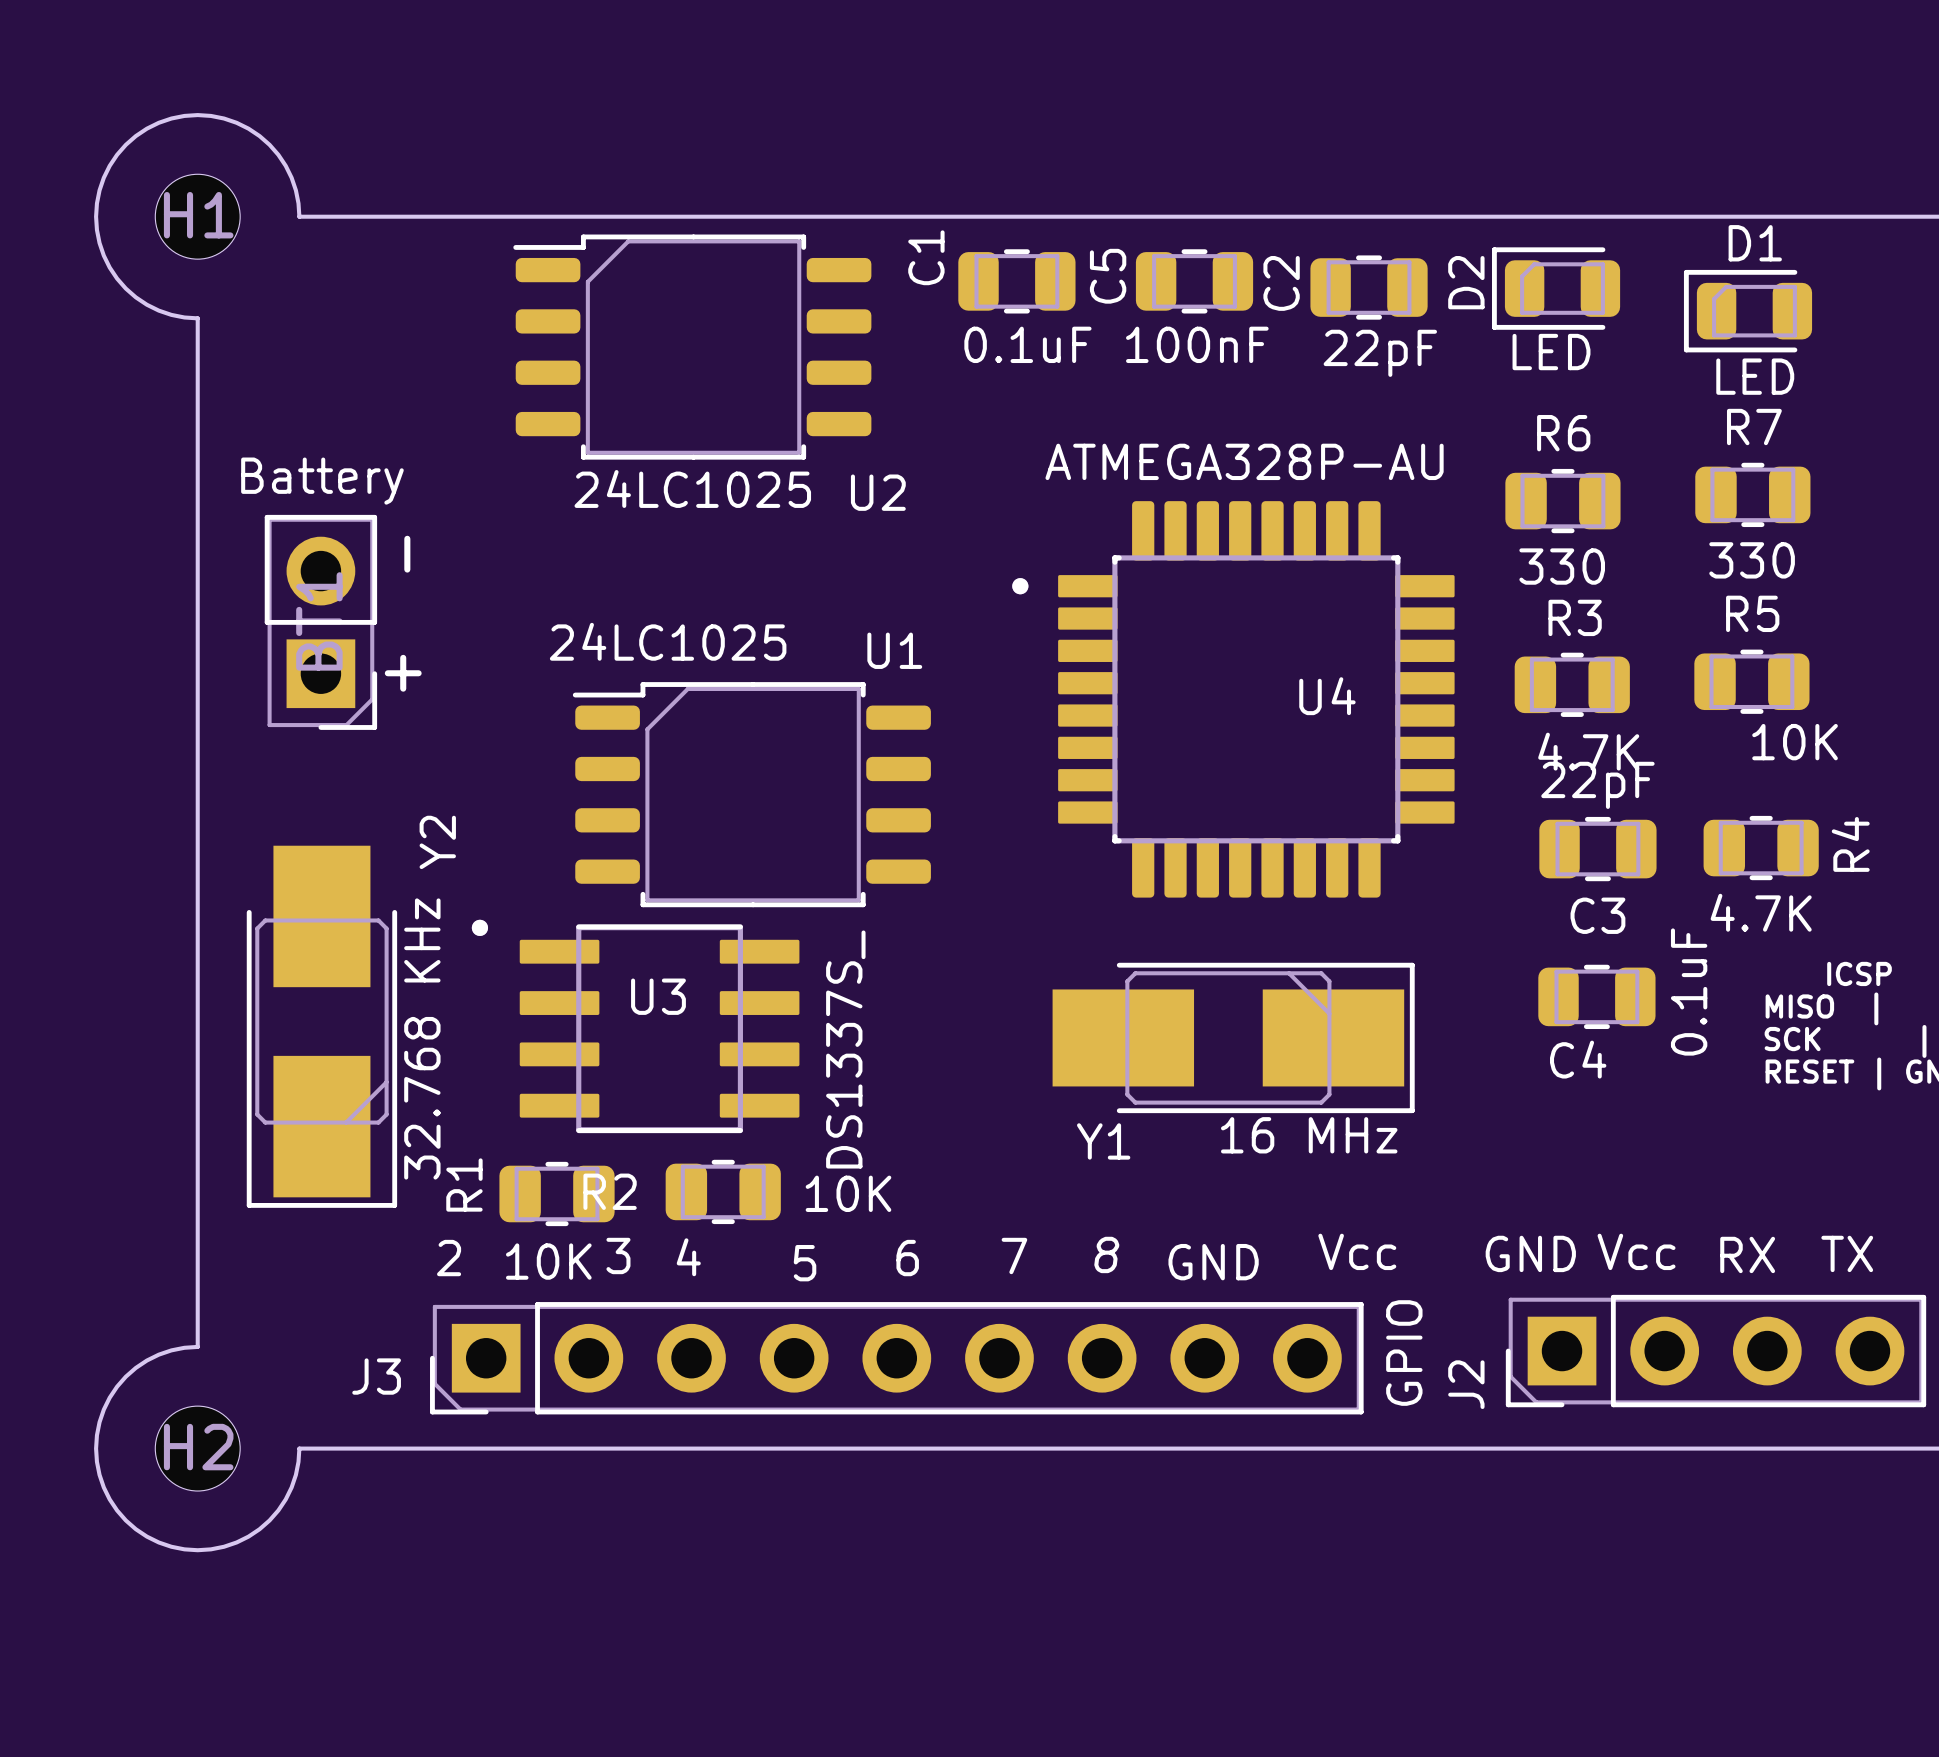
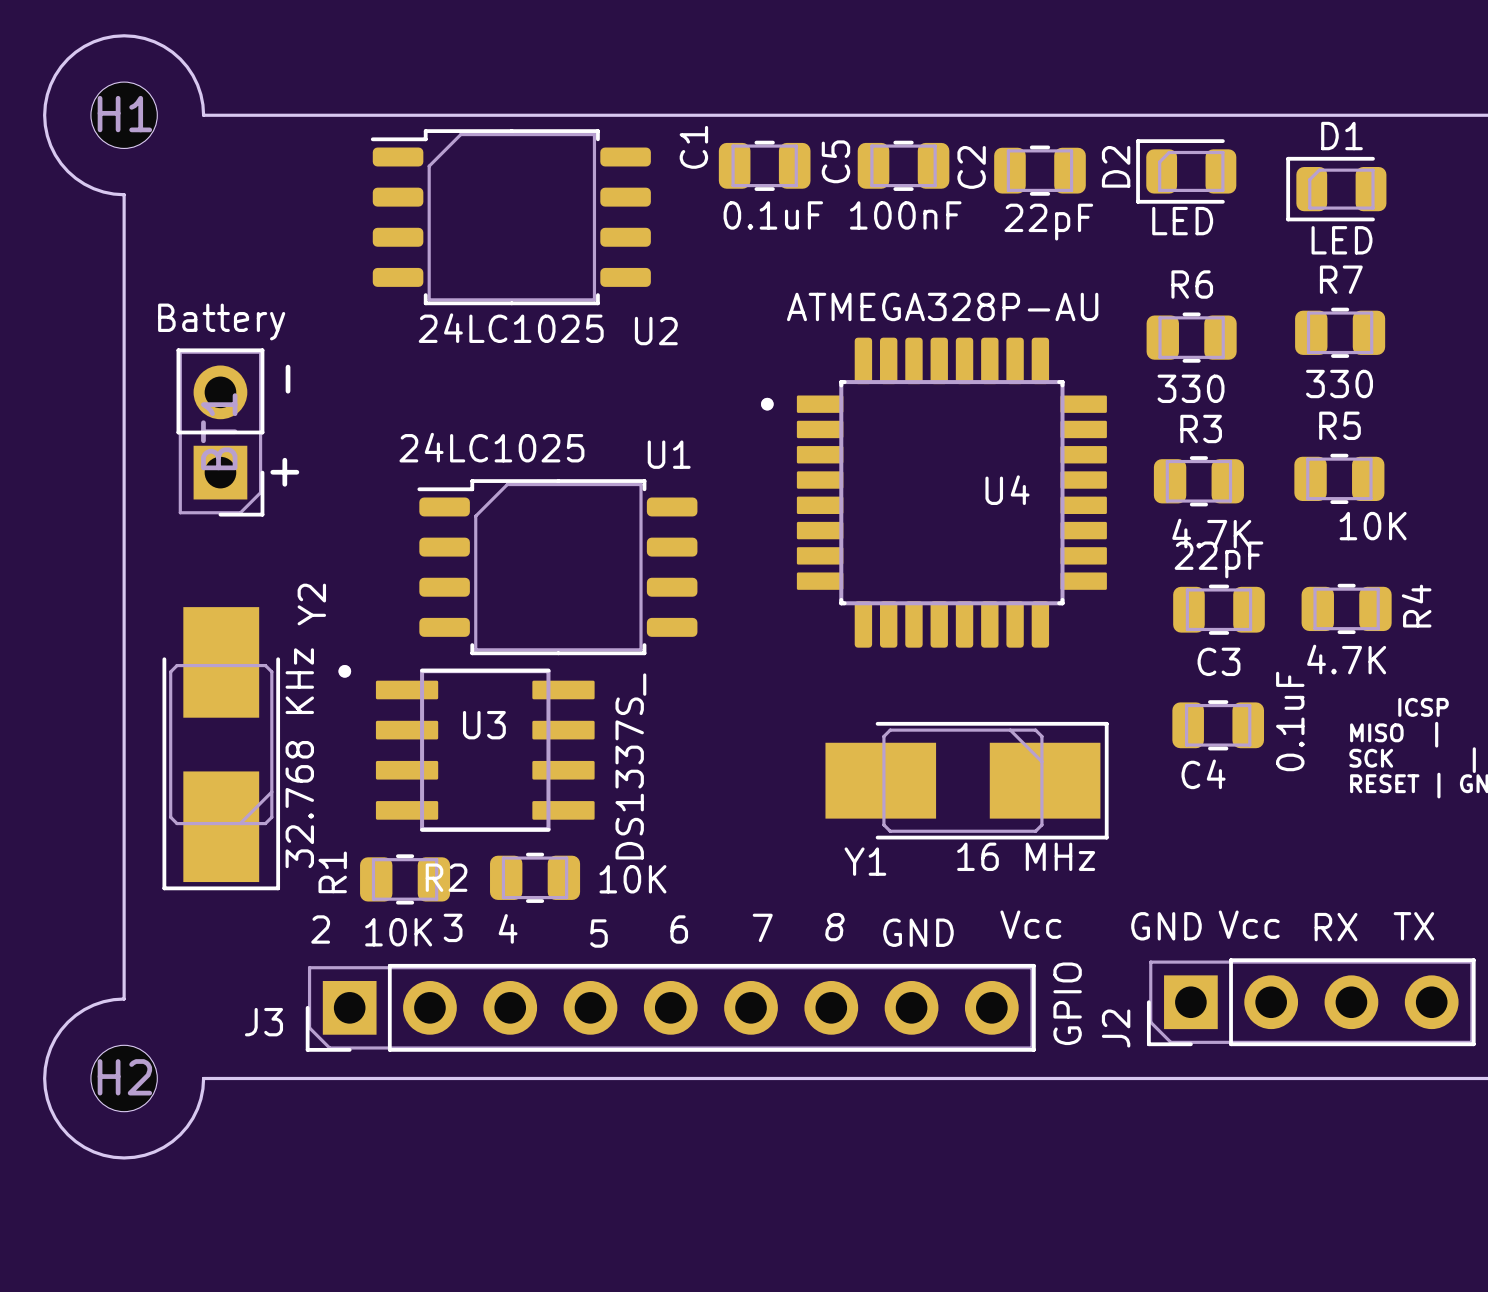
Y1 position: (1233, 1037) -> (967, 780)

